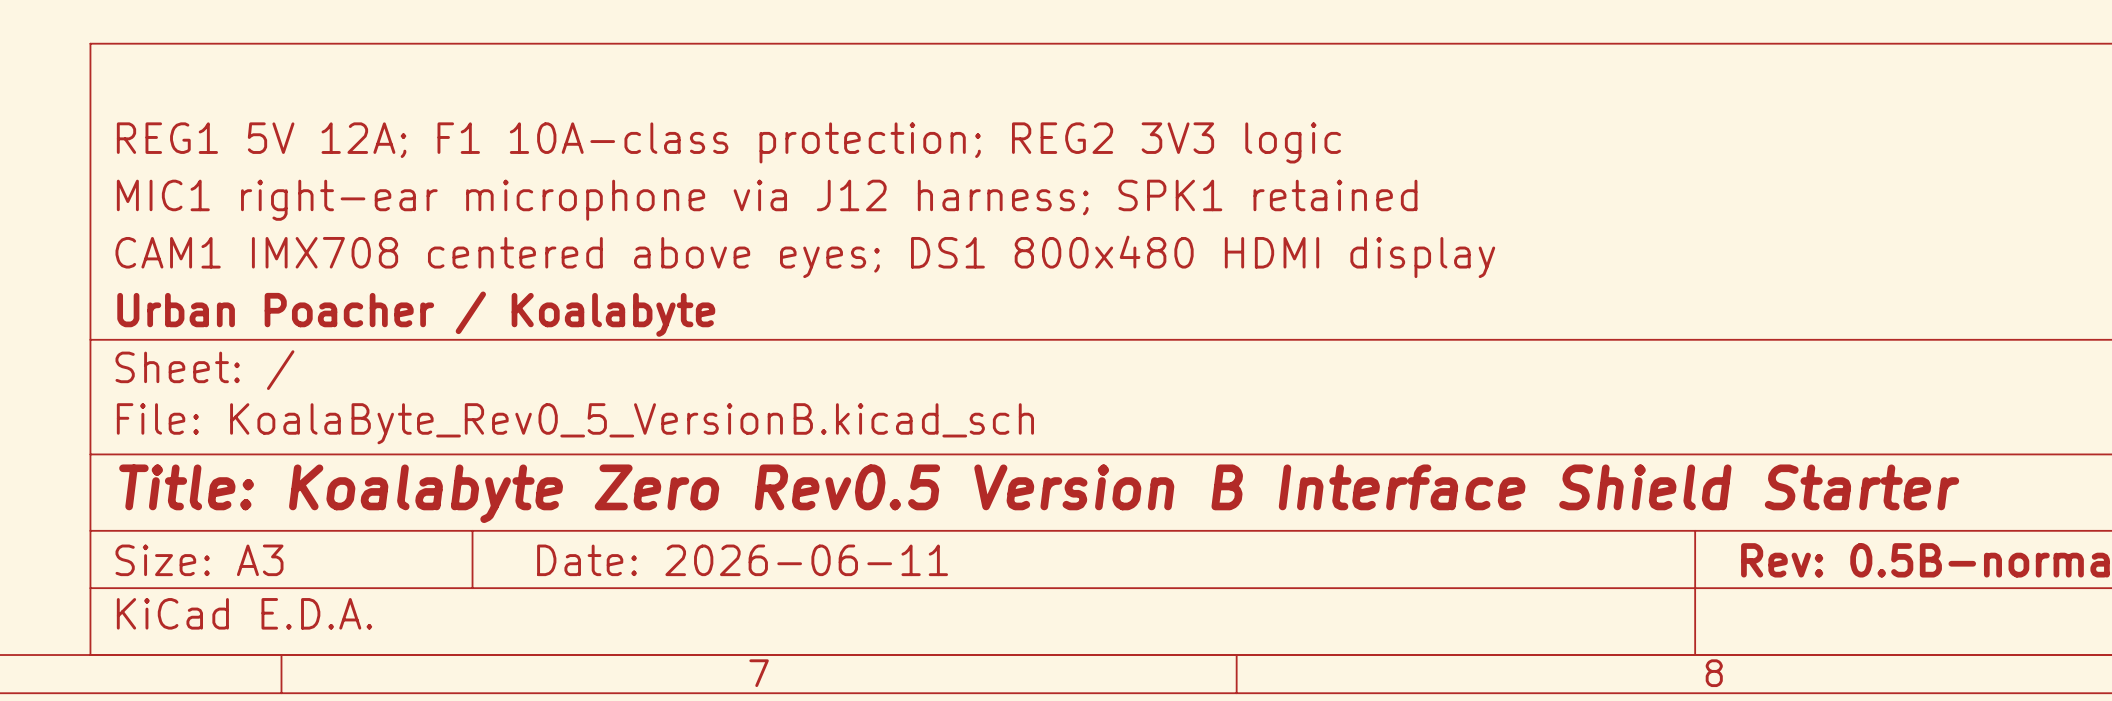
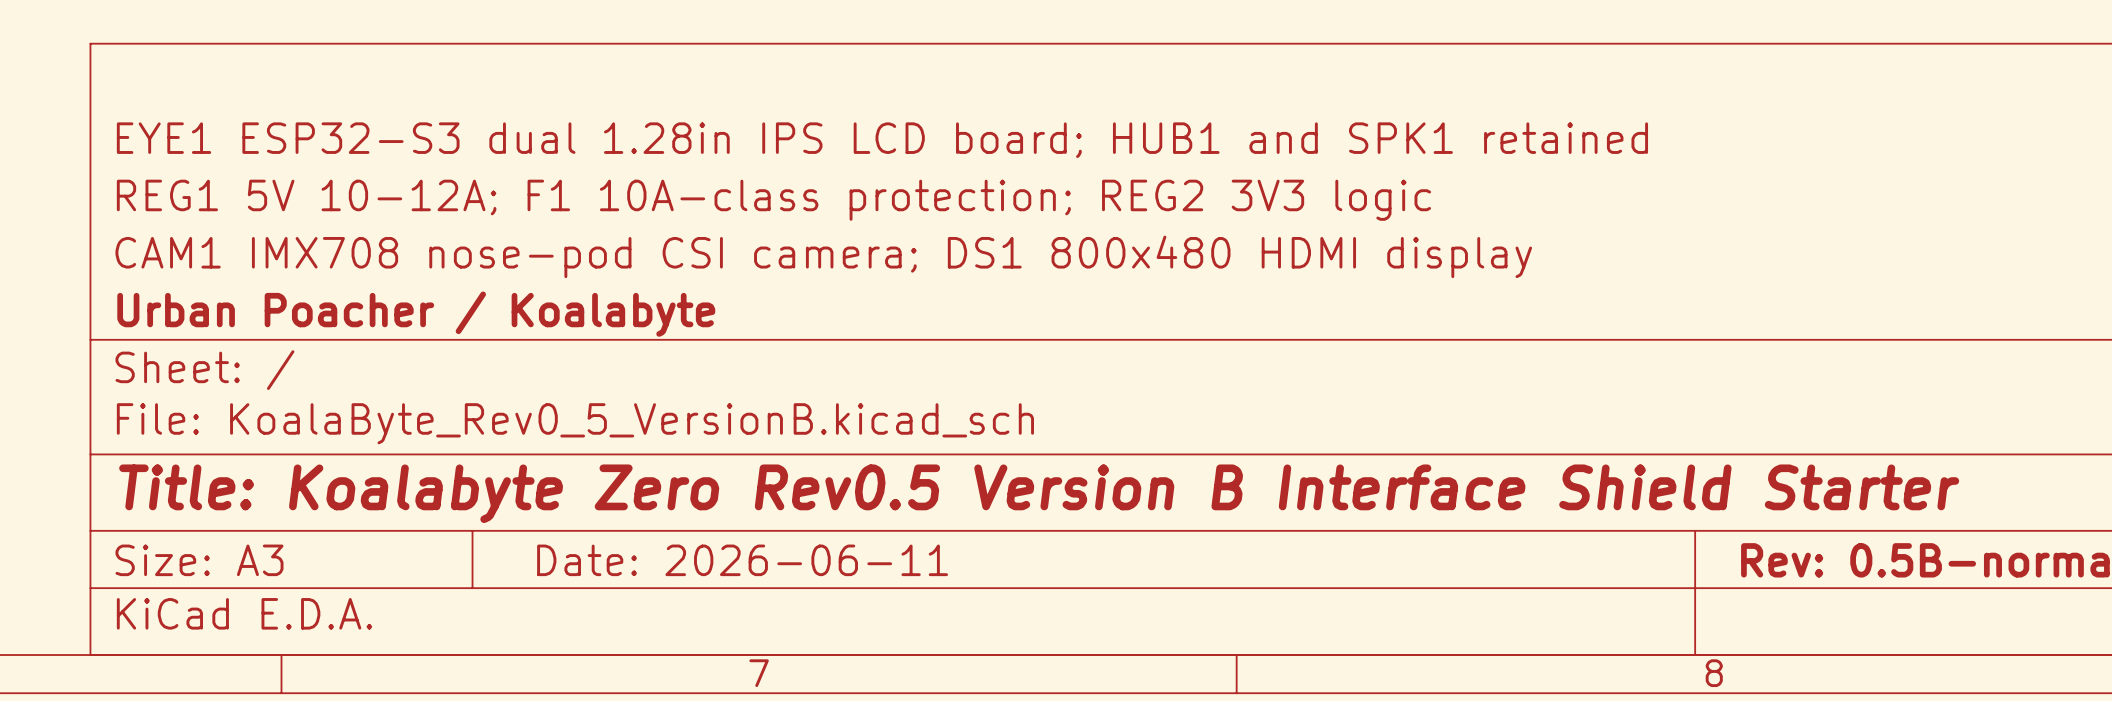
title block: REG1 5V 12A; F1 10A-class protection; REG2 3V3 logic (728, 142) -> EYE1 ESP32-S3 dual 1.28in IPS LCD board; HUB1 and SPK1 retained (882, 140)
title block: MIC1 right-ear microphone via J12 harness; SPK1 retained (767, 200) -> REG1 5V 10-12A; F1 10A-class protection; REG2 3V3 logic (773, 200)
title block: CAM1 IMX708 centered above eyes; DS1 800x480 HDMI display (805, 256) -> CAM1 IMX708 nose-pod CSI camera; DS1 800x480 HDMI display (823, 256)

